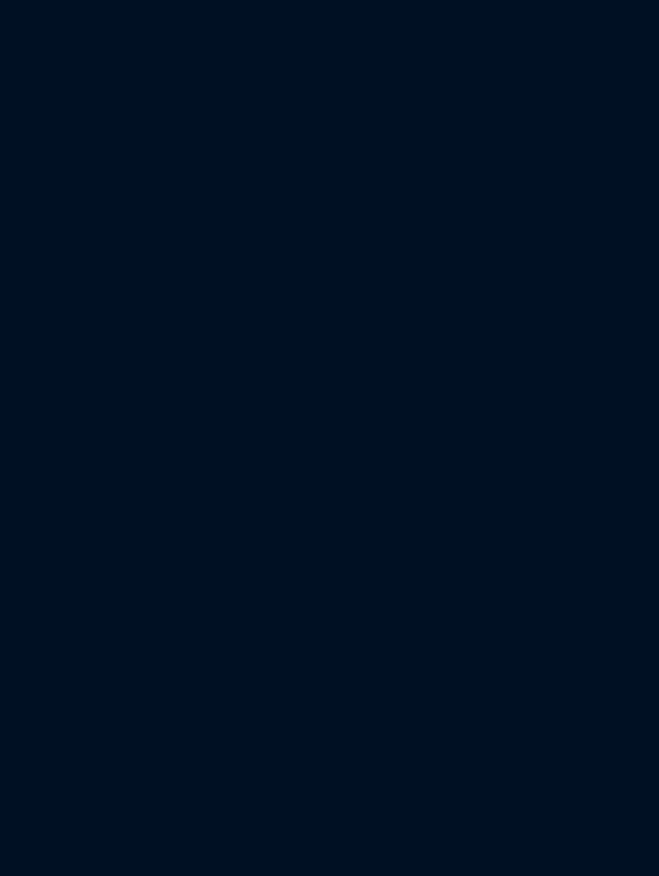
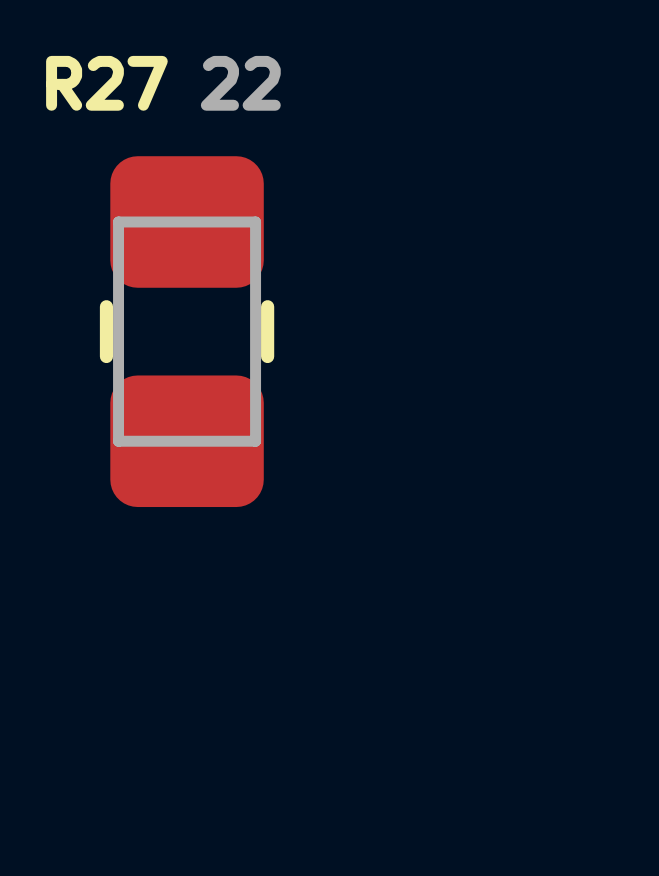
R27: none -> 22 (187, 331)

